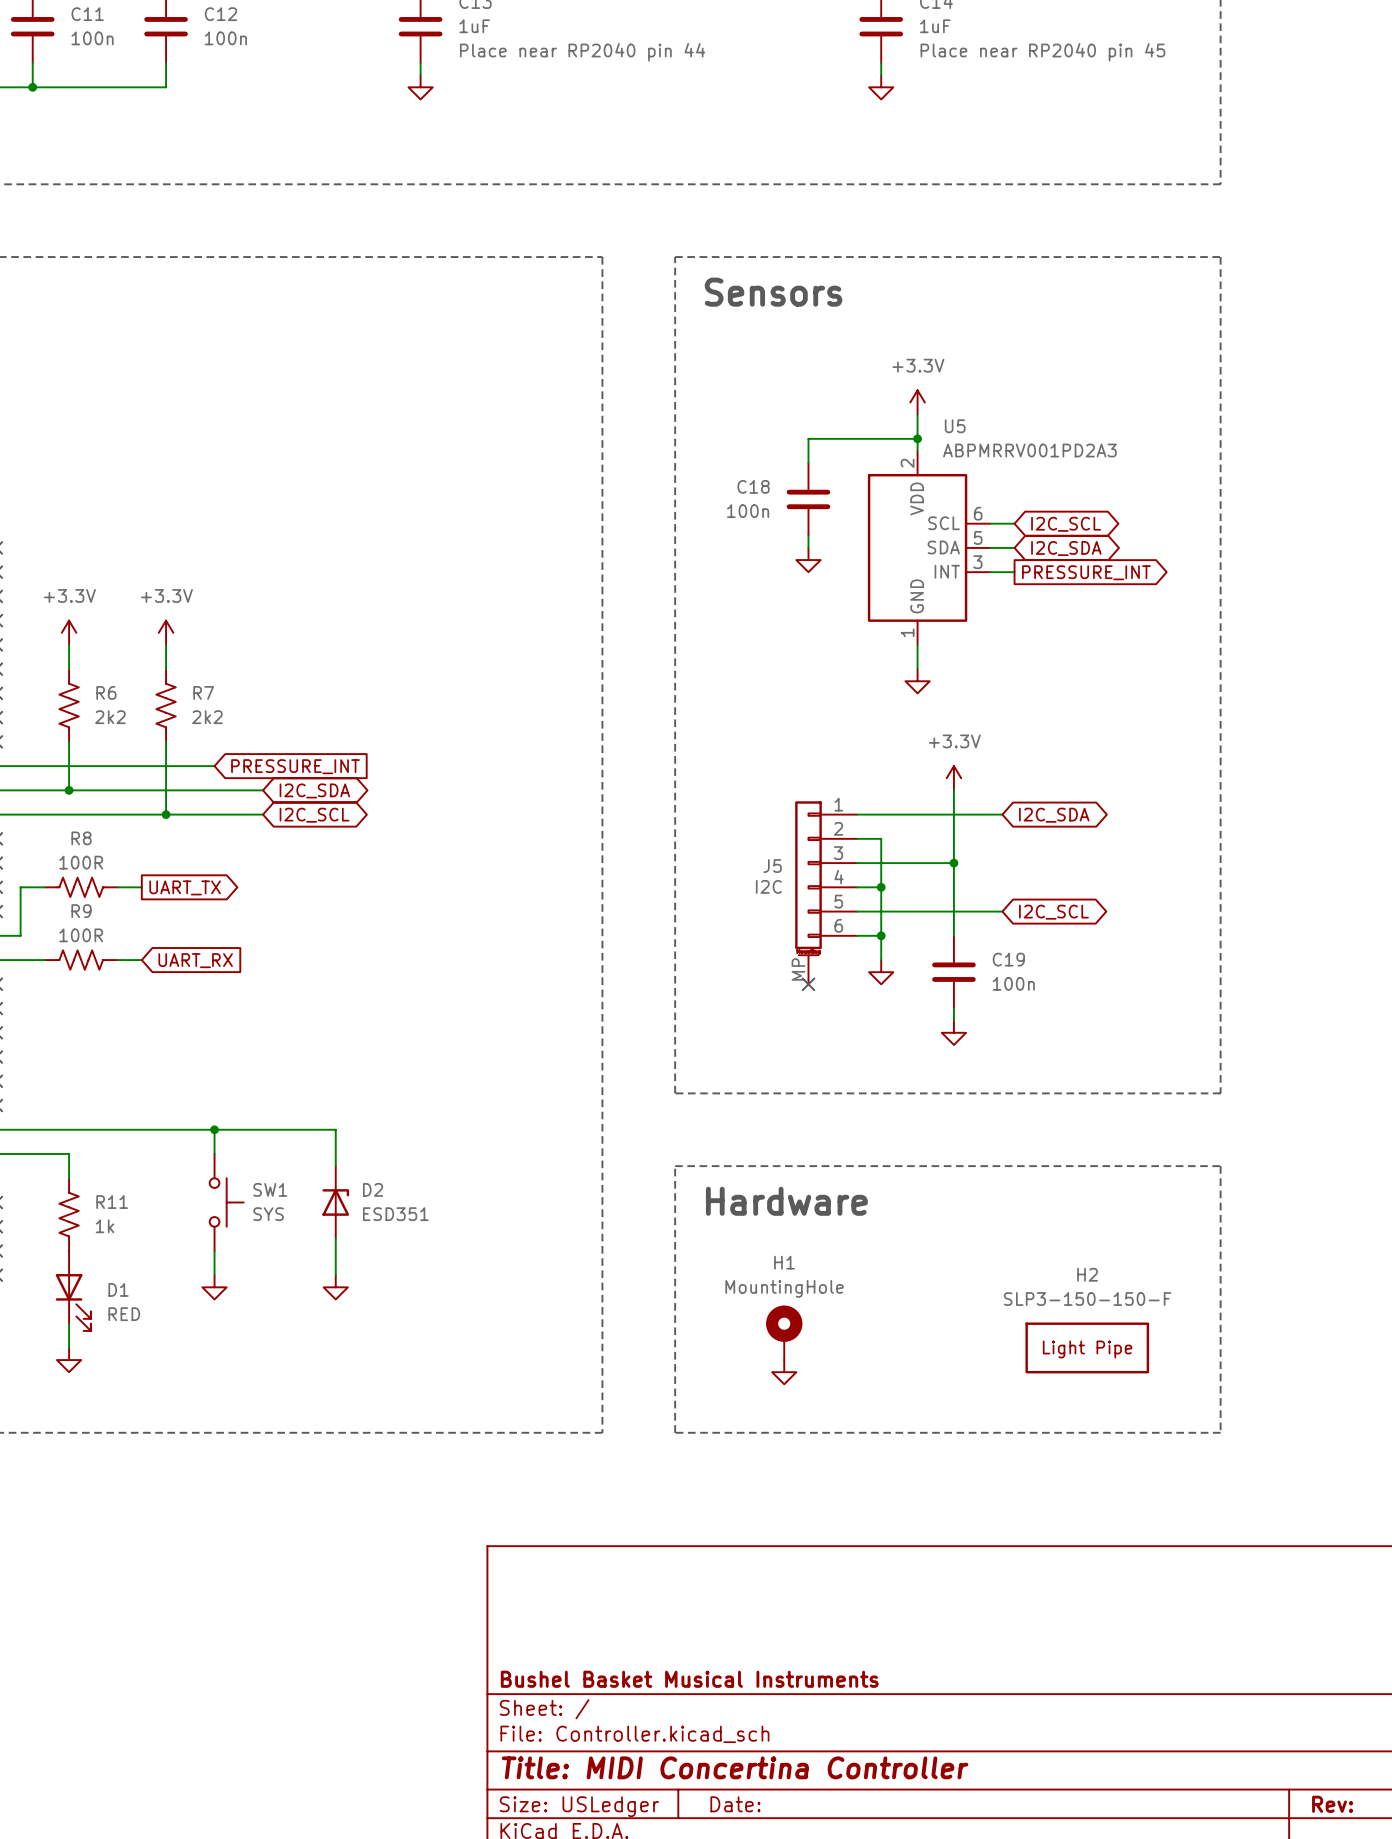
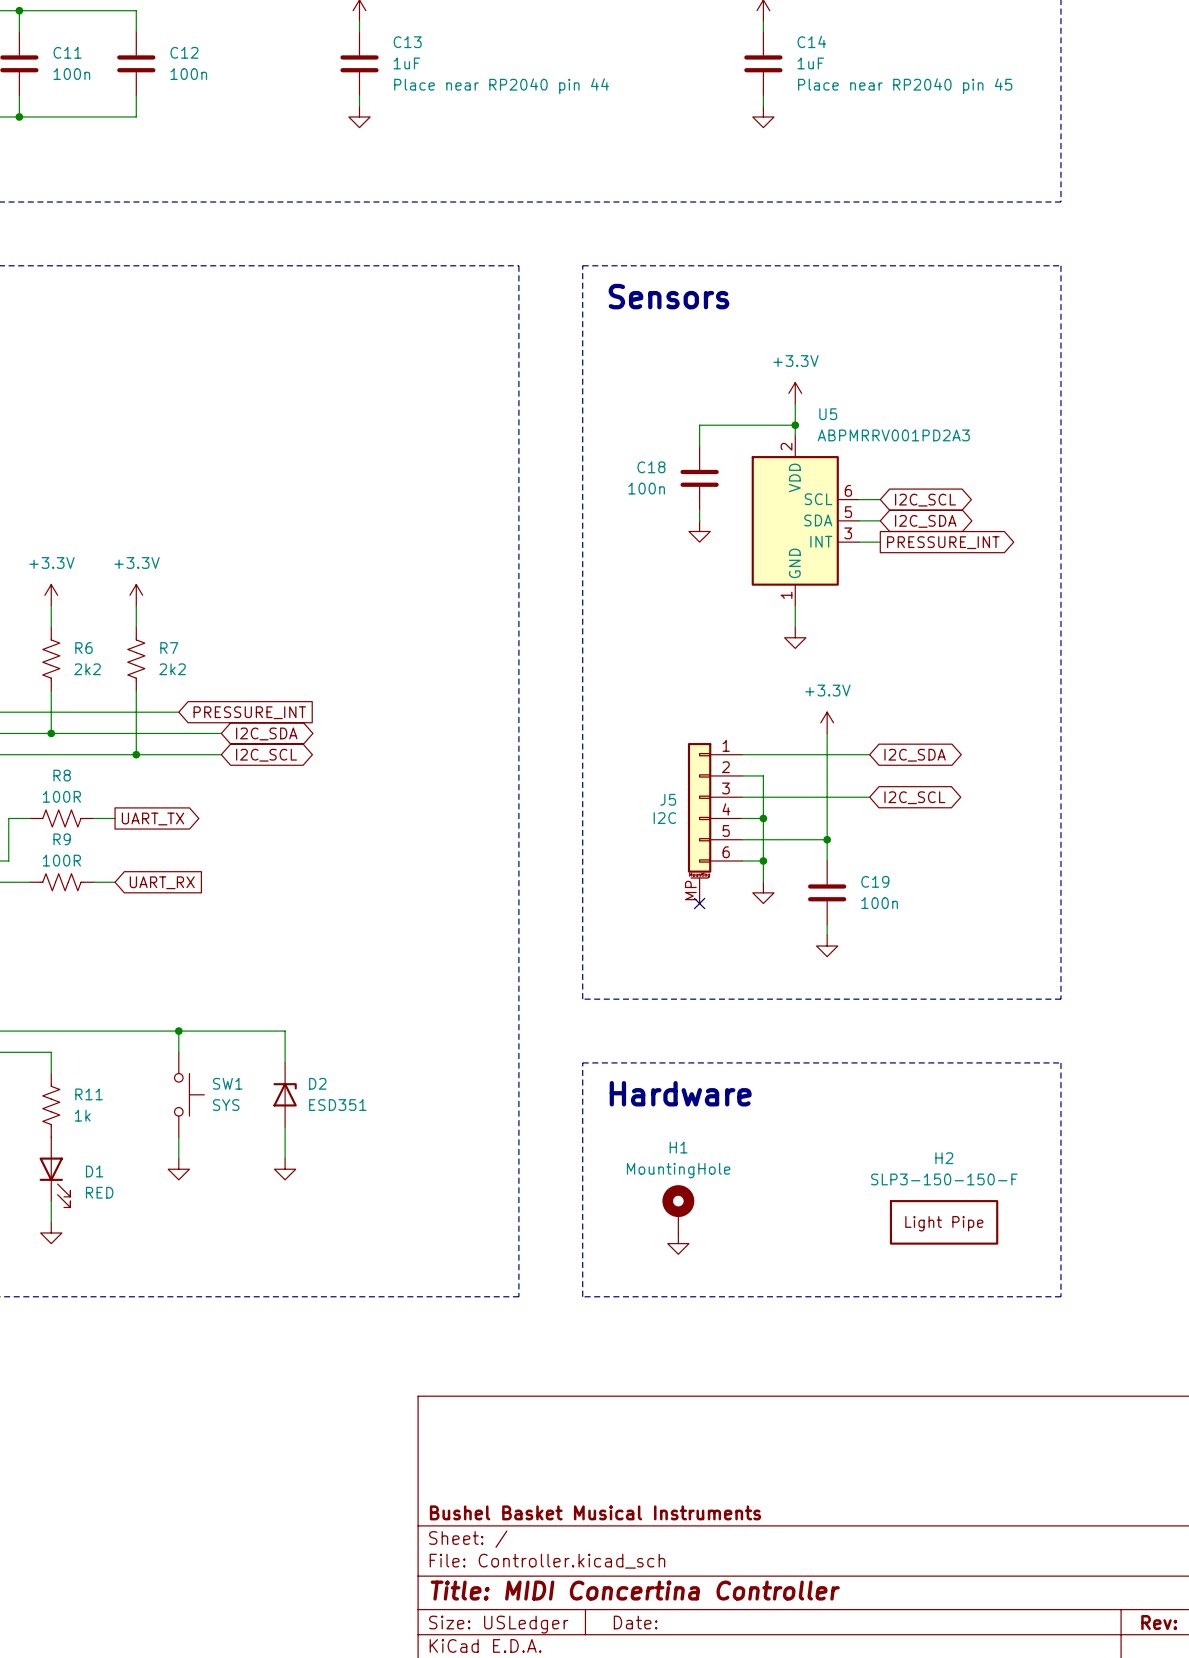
junction position: (953, 863) -> (827, 839)
wire: (953, 911) (1002, 911) -> (827, 797) (869, 797)
global label position: I2C_SCL (1053, 912) -> I2C_SCL (914, 797)

